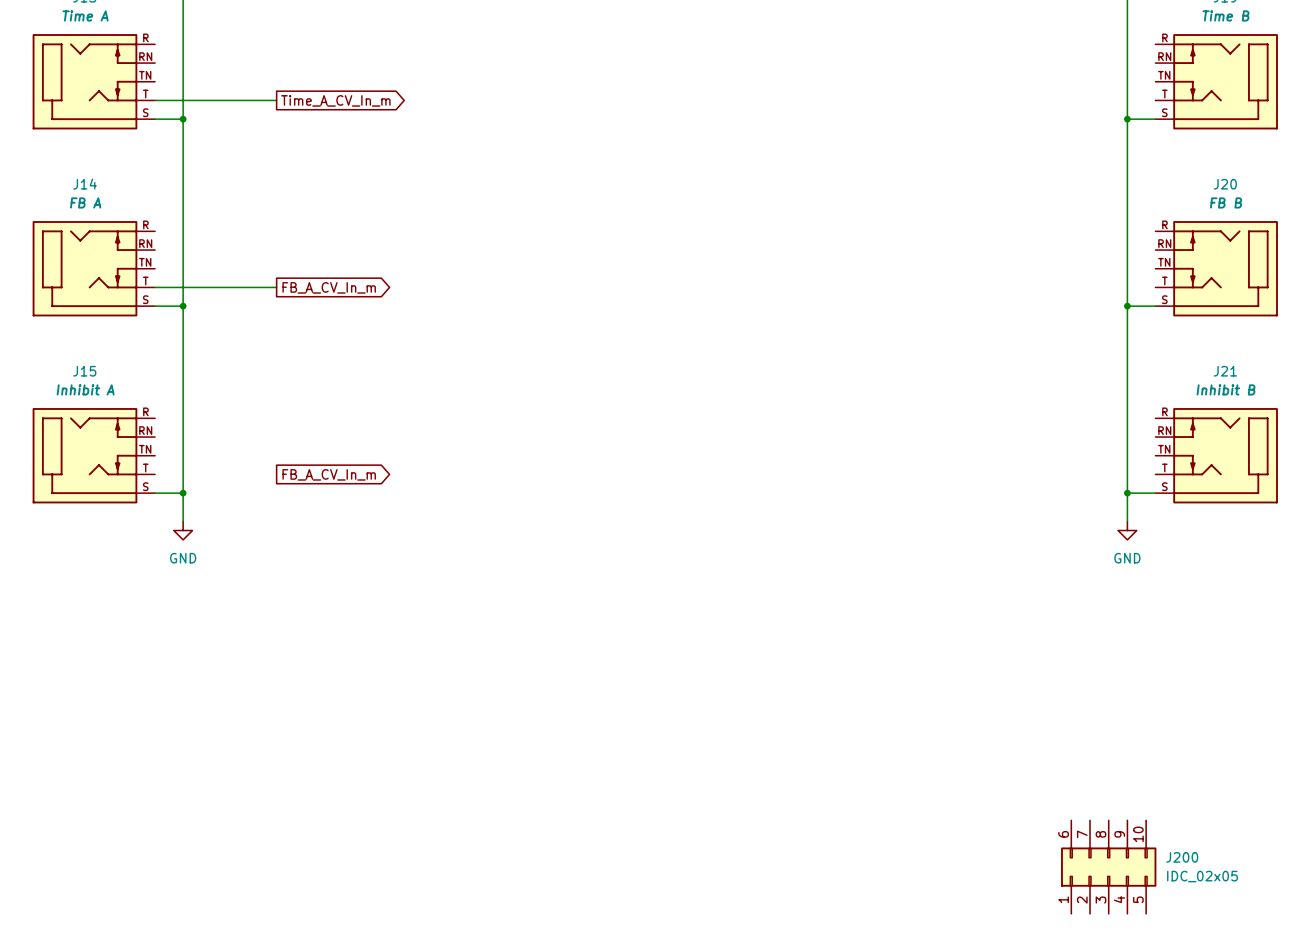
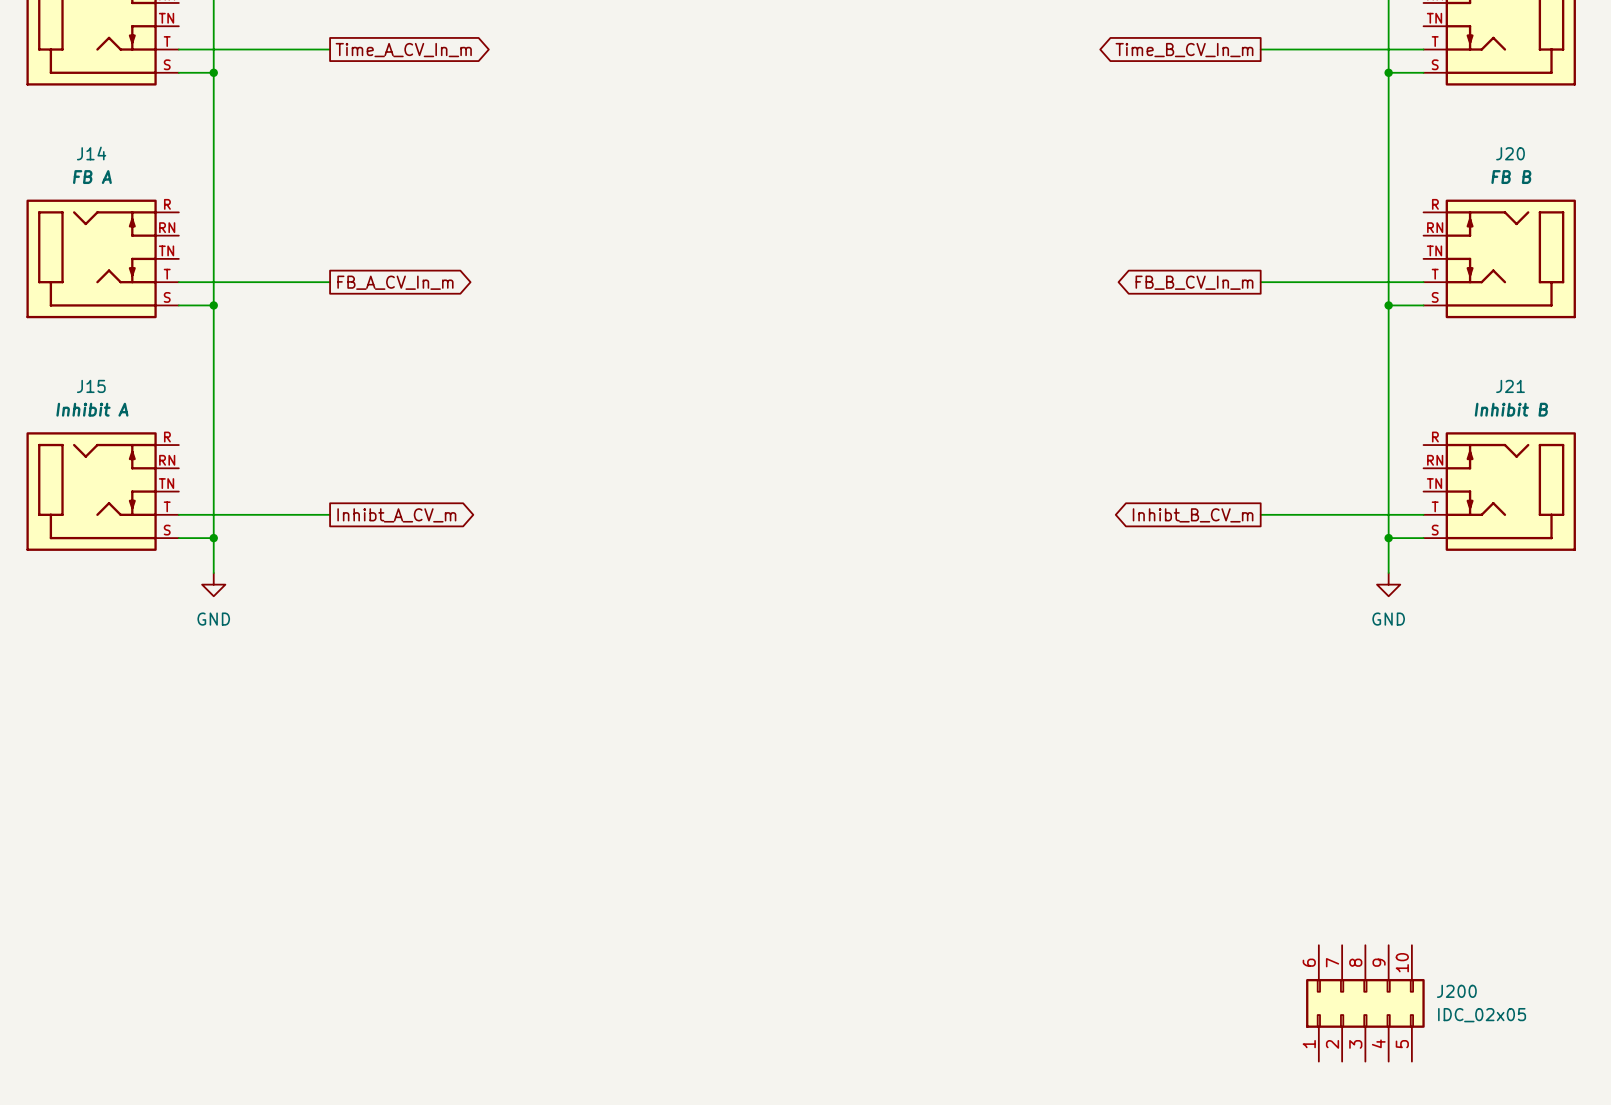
global label: none -> Time_B_CV_In_m (1184, 50)
wire: none -> (1260, 49) (1423, 49)
global label: none -> FB_B_CV_In_m (1194, 282)
wire: none -> (1260, 282) (1423, 282)
wire: none -> (178, 514) (330, 514)
global label: FB_A_CV_In_m (329, 474) -> Inhibt_A_CV_m (396, 515)
global label: none -> Inhibt_B_CV_m (1193, 515)
wire: none -> (1260, 514) (1423, 514)

